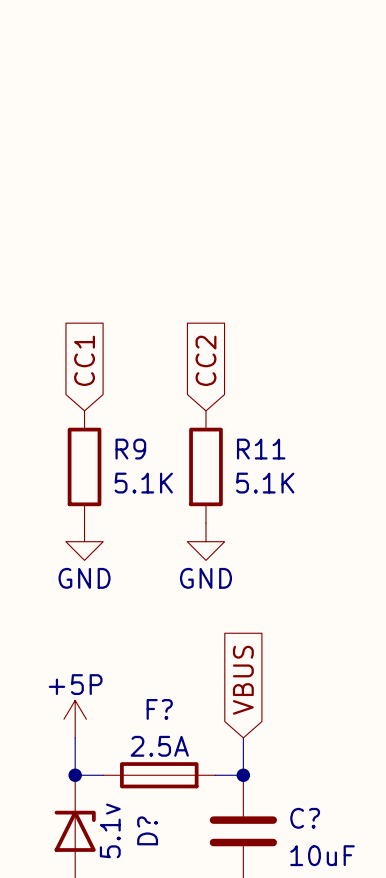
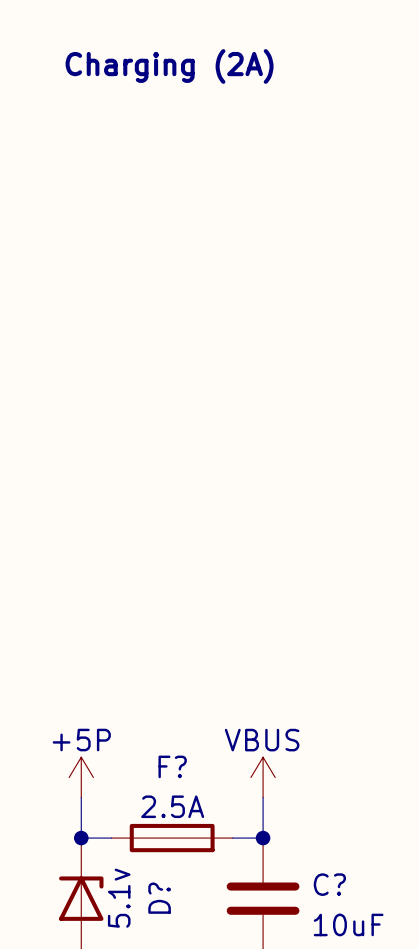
text: none -> Charging (2A) (169, 66)
global label: CC1 (84, 360) -> none
global label: CC2 (205, 360) -> none
R9: 5.1K (84, 466) -> none
R11: 5.1K (205, 466) -> none
power symbol: GND (84, 541) -> none
power symbol: GND (205, 541) -> none
global label: VBUS (243, 680) -> none
power symbol: none -> VBUS (263, 777)

